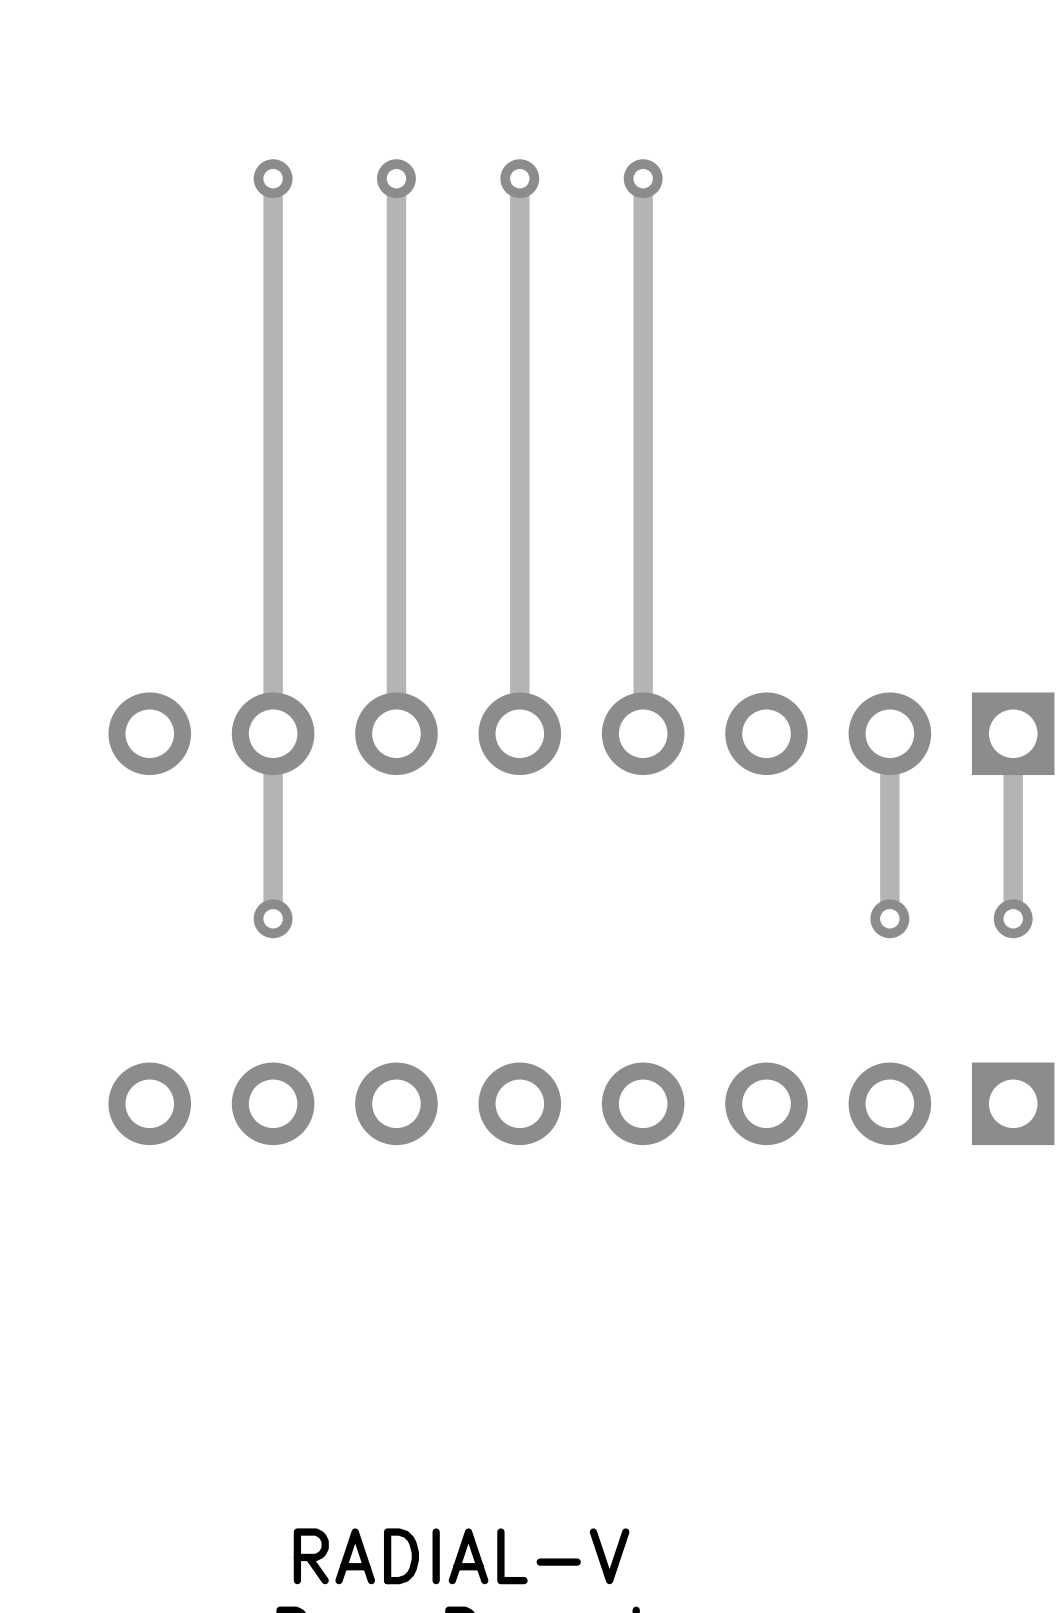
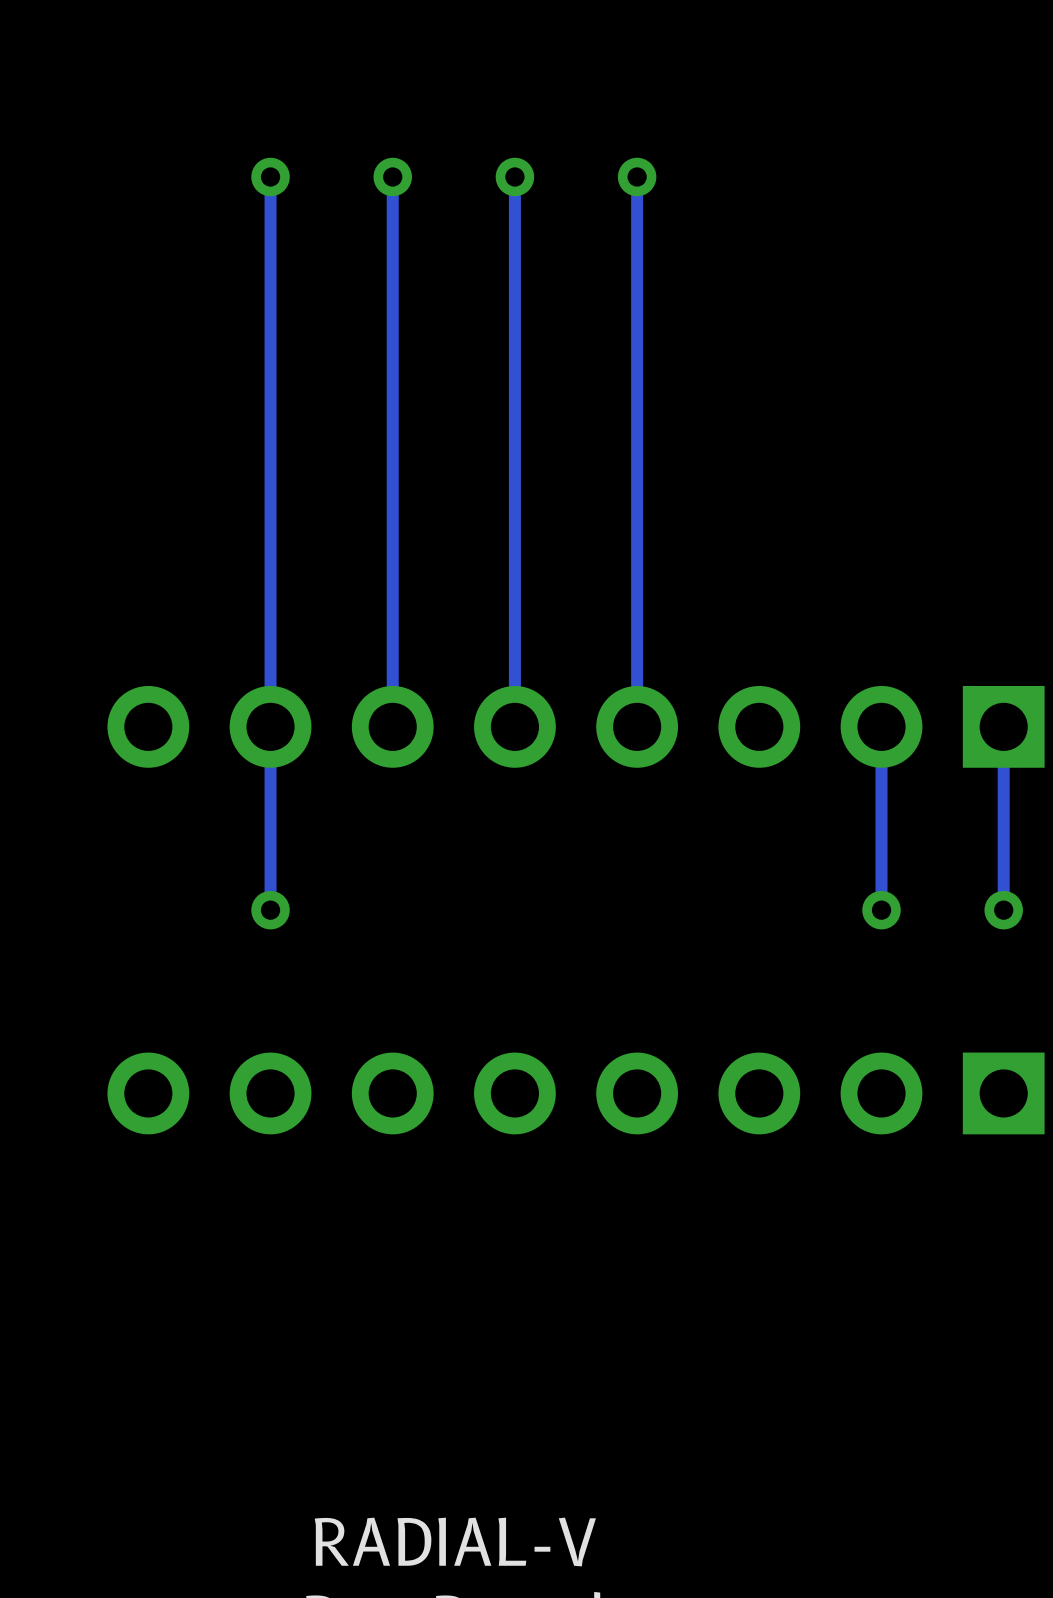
track width: thick (273, 178) (273, 918) -> thin (270, 176) (270, 910)
track width: thick (396, 178) (396, 733) -> thin (392, 176) (392, 726)
track width: thick (519, 178) (519, 733) -> thin (514, 176) (514, 726)
track width: thick (643, 178) (643, 733) -> thin (637, 176) (637, 726)
track width: thick (889, 733) (889, 918) -> thin (881, 726) (881, 910)
track width: thick (1013, 733) (1013, 918) -> thin (1003, 726) (1003, 910)

